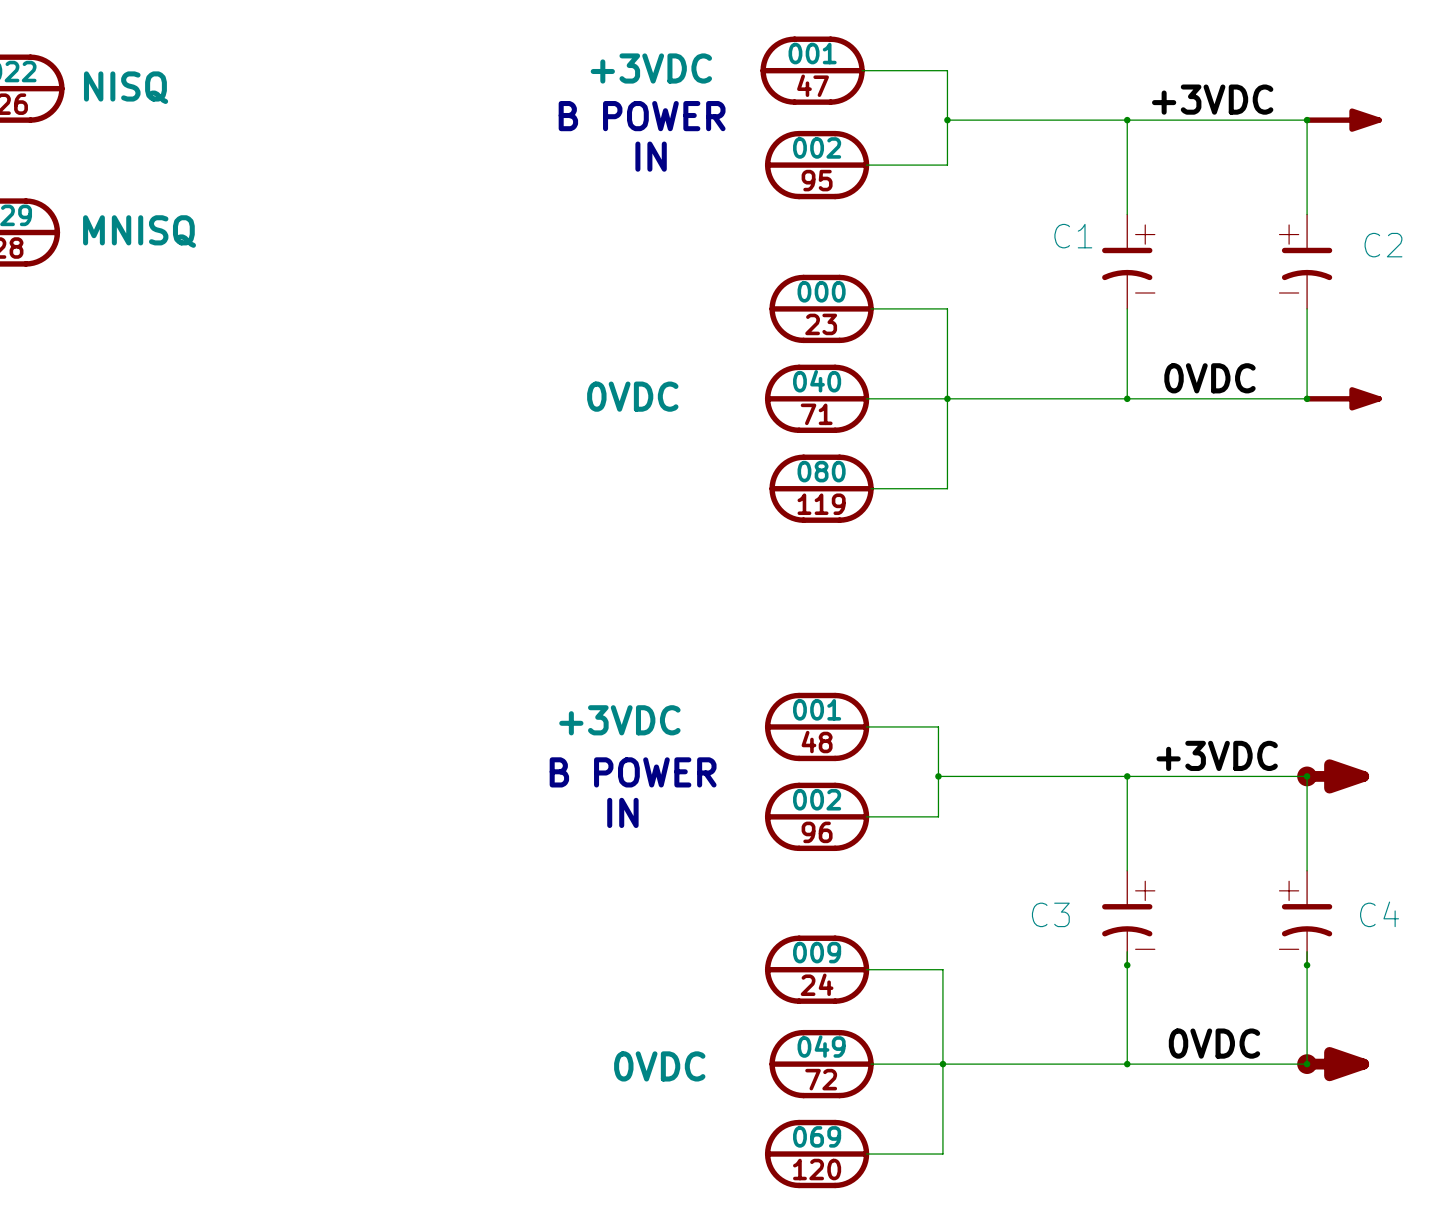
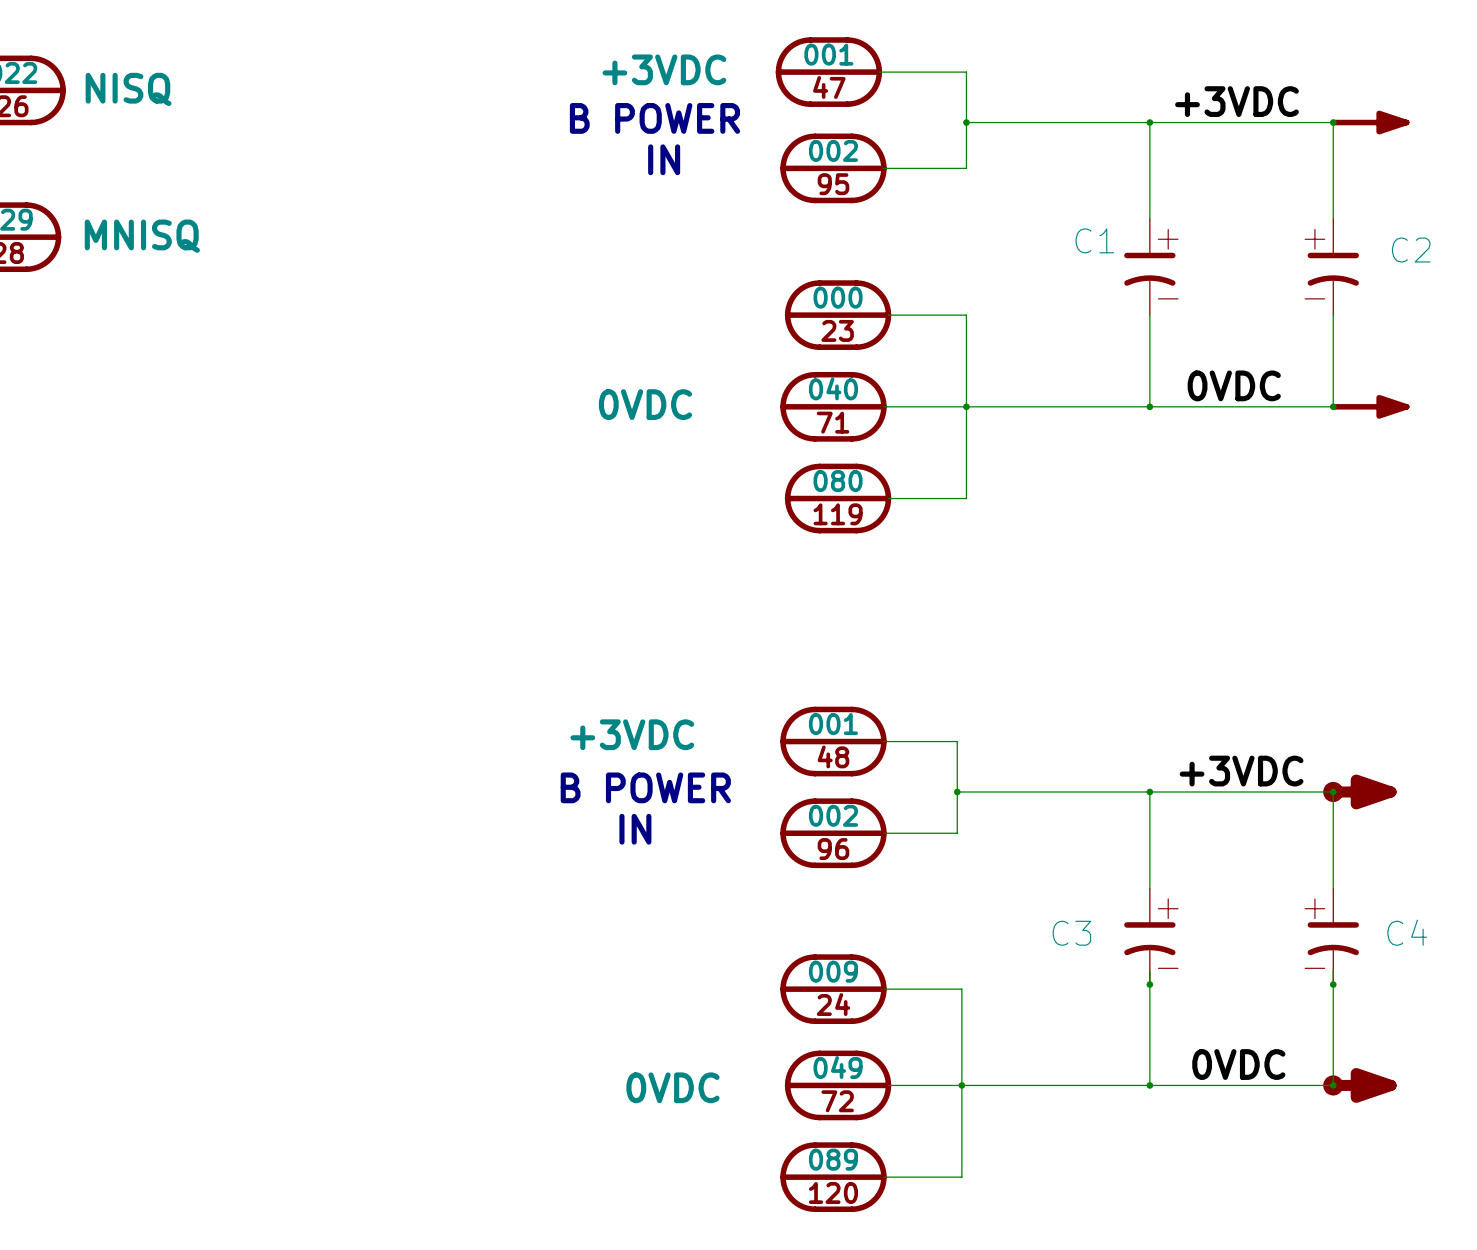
part text: 069 (817, 1136) -> 089 (833, 1159)

